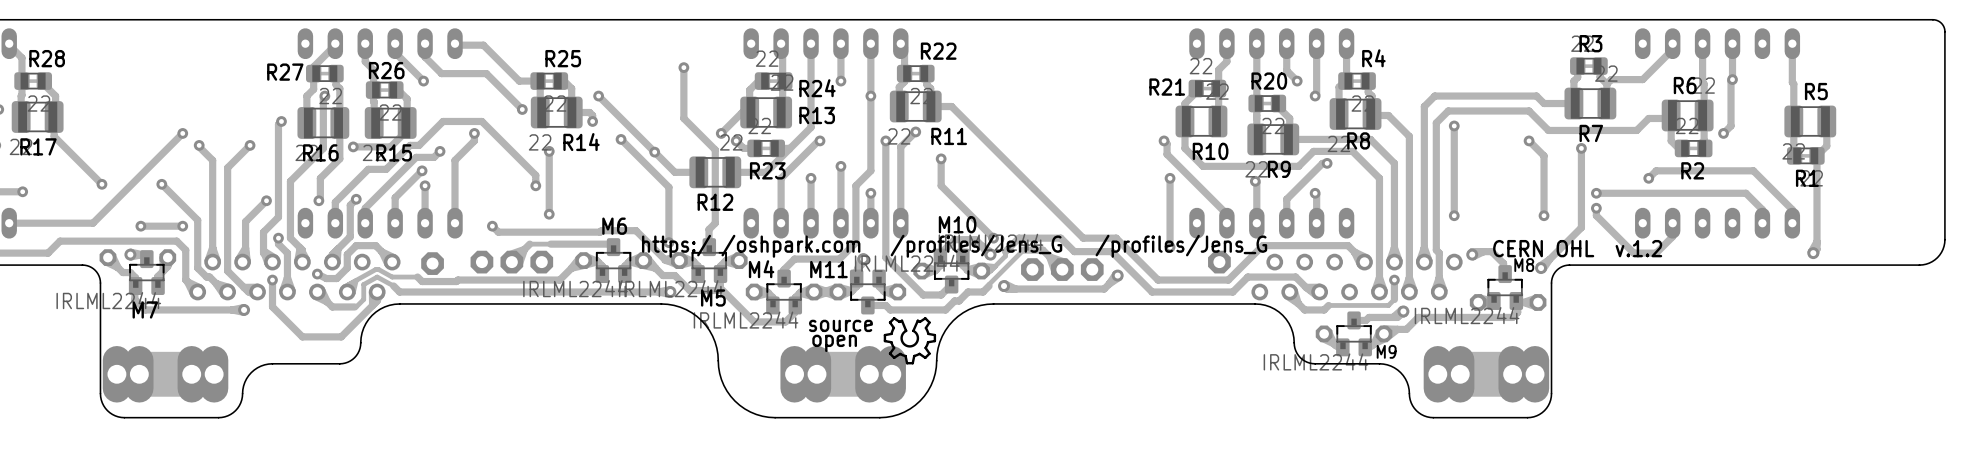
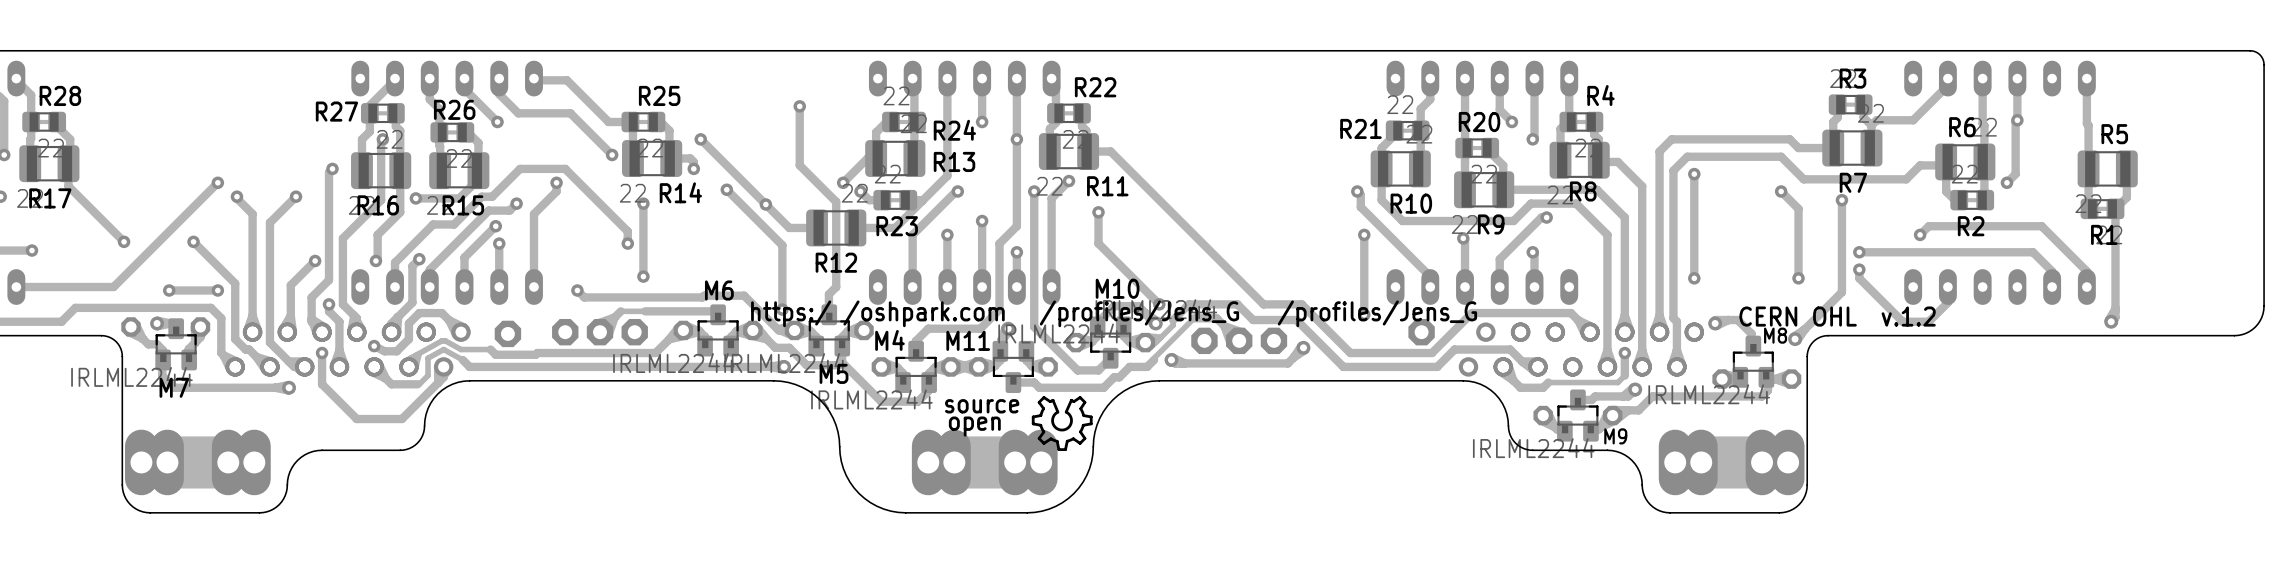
part: none -> (330, 349)
part: none -> (1598, 349)

